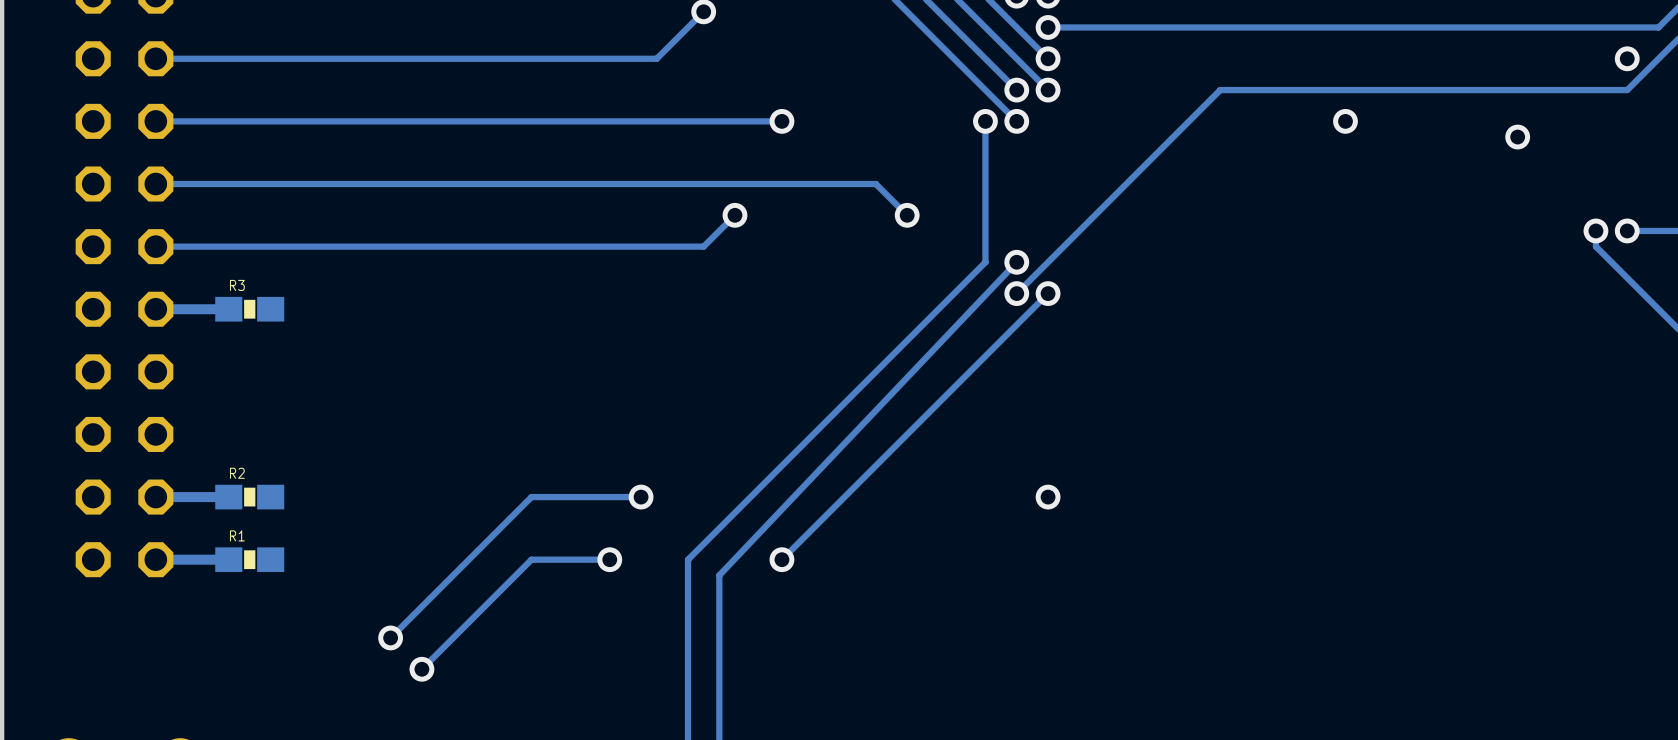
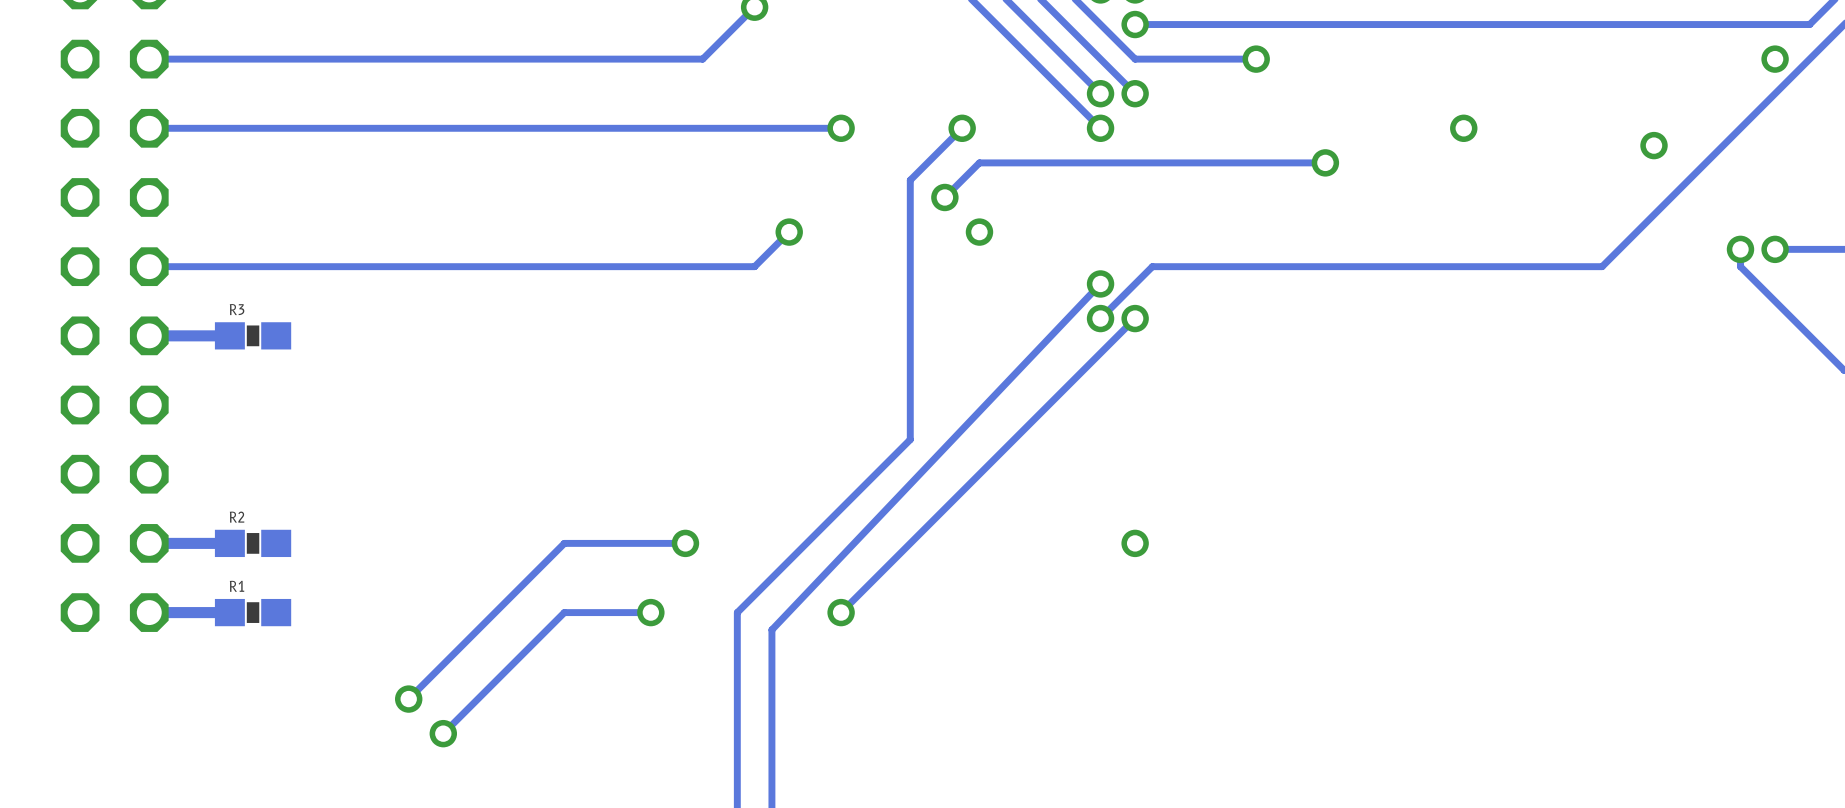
via: (1048, 58) -> none
track: none -> (1256, 59) (1135, 59)
via: none -> (1256, 59)
track: (1627, 90) (1220, 90) (1063, 246) -> (1775, 93) (1602, 266) (1152, 266)
via: none -> (962, 128)
track: (985, 121) (985, 262) (844, 403) -> (962, 128) (910, 180) (910, 439)
via: (985, 121) -> none
track: none -> (1325, 162) (979, 162) (944, 197)
via: none -> (1325, 162)
track: (155, 184) (875, 184) (907, 215) -> none
via: none -> (944, 197)

